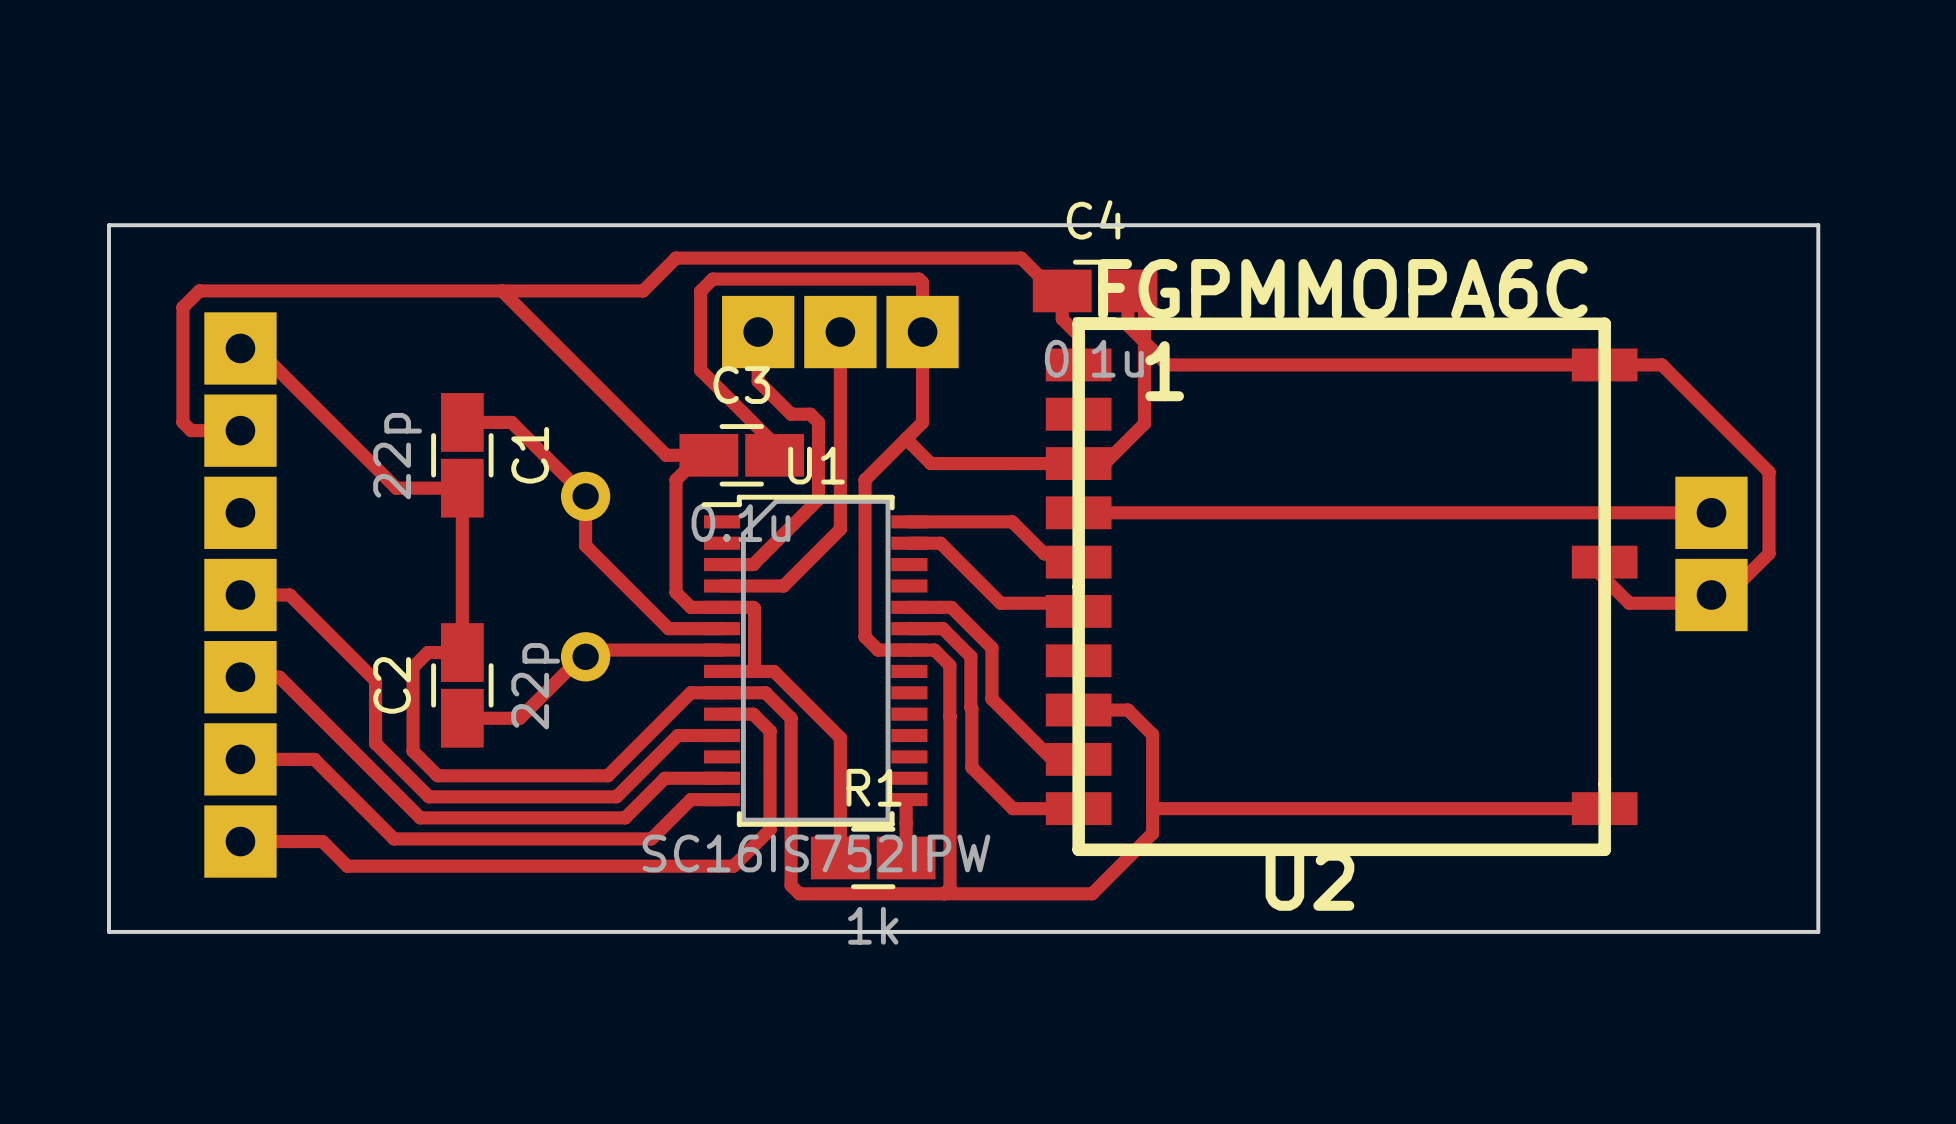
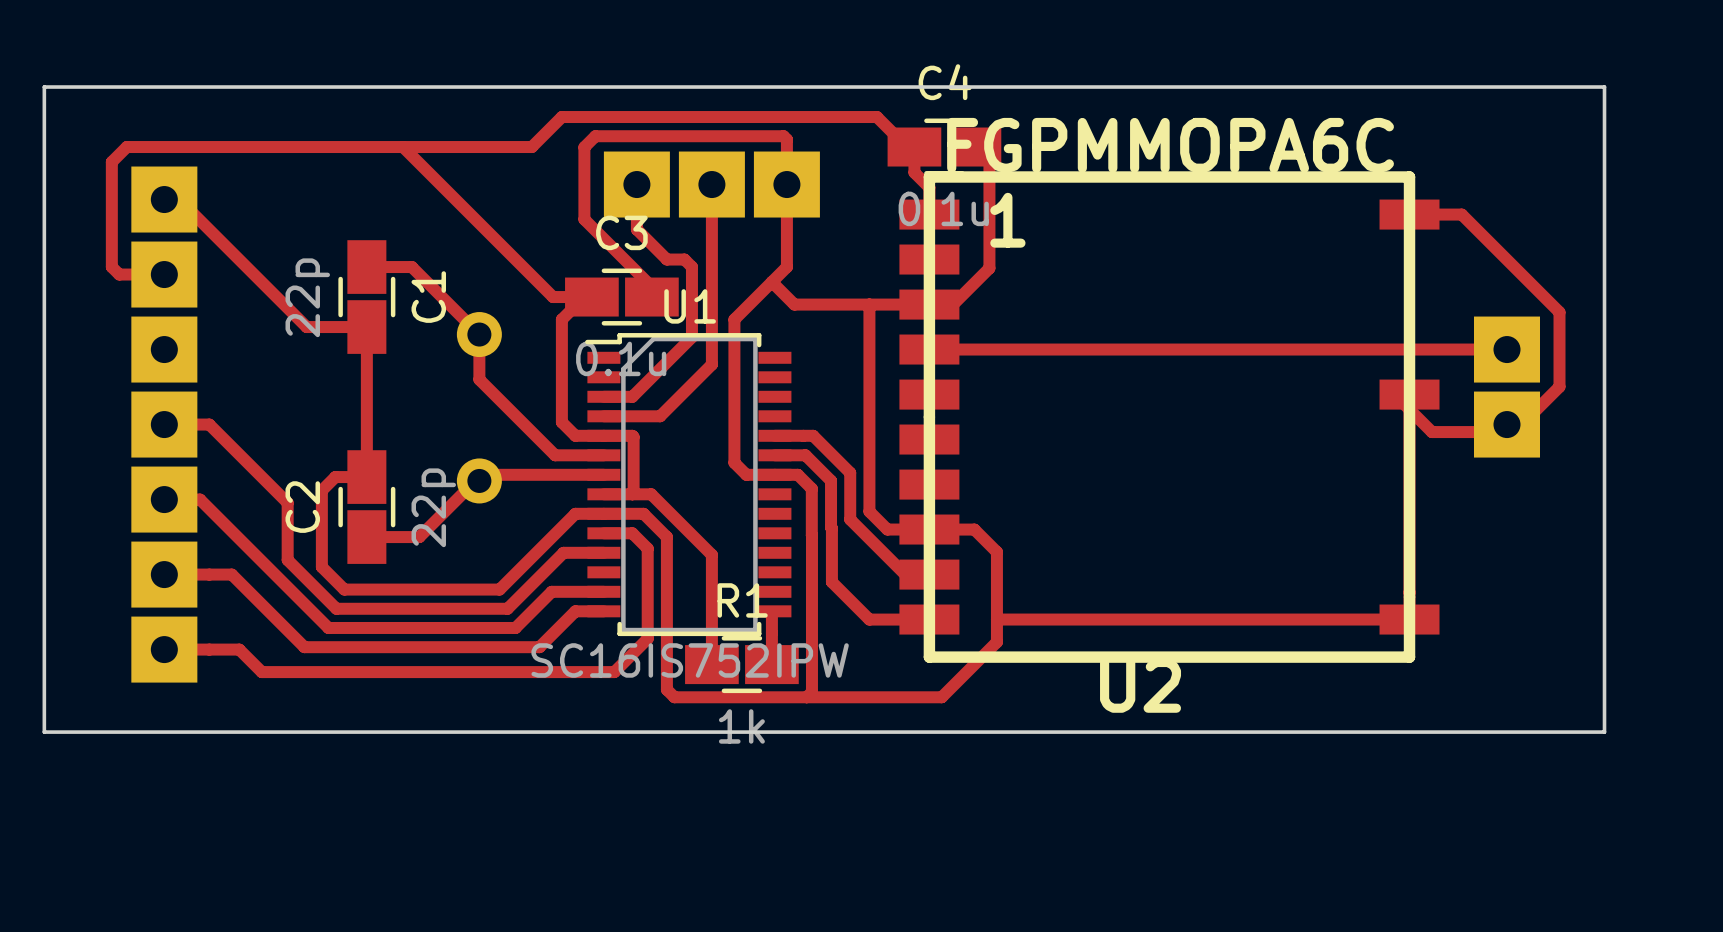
track: (1128, 290) (1128, 325) (1167, 364) (1604, 364) -> none
track: none -> (869, 304) (869, 511) (887, 529) (921, 529)
track: (909, 521) (1012, 521) (1044, 553) (1078, 553) -> none
track: (909, 543) (940, 543) (1000, 603) (1078, 603) -> none

